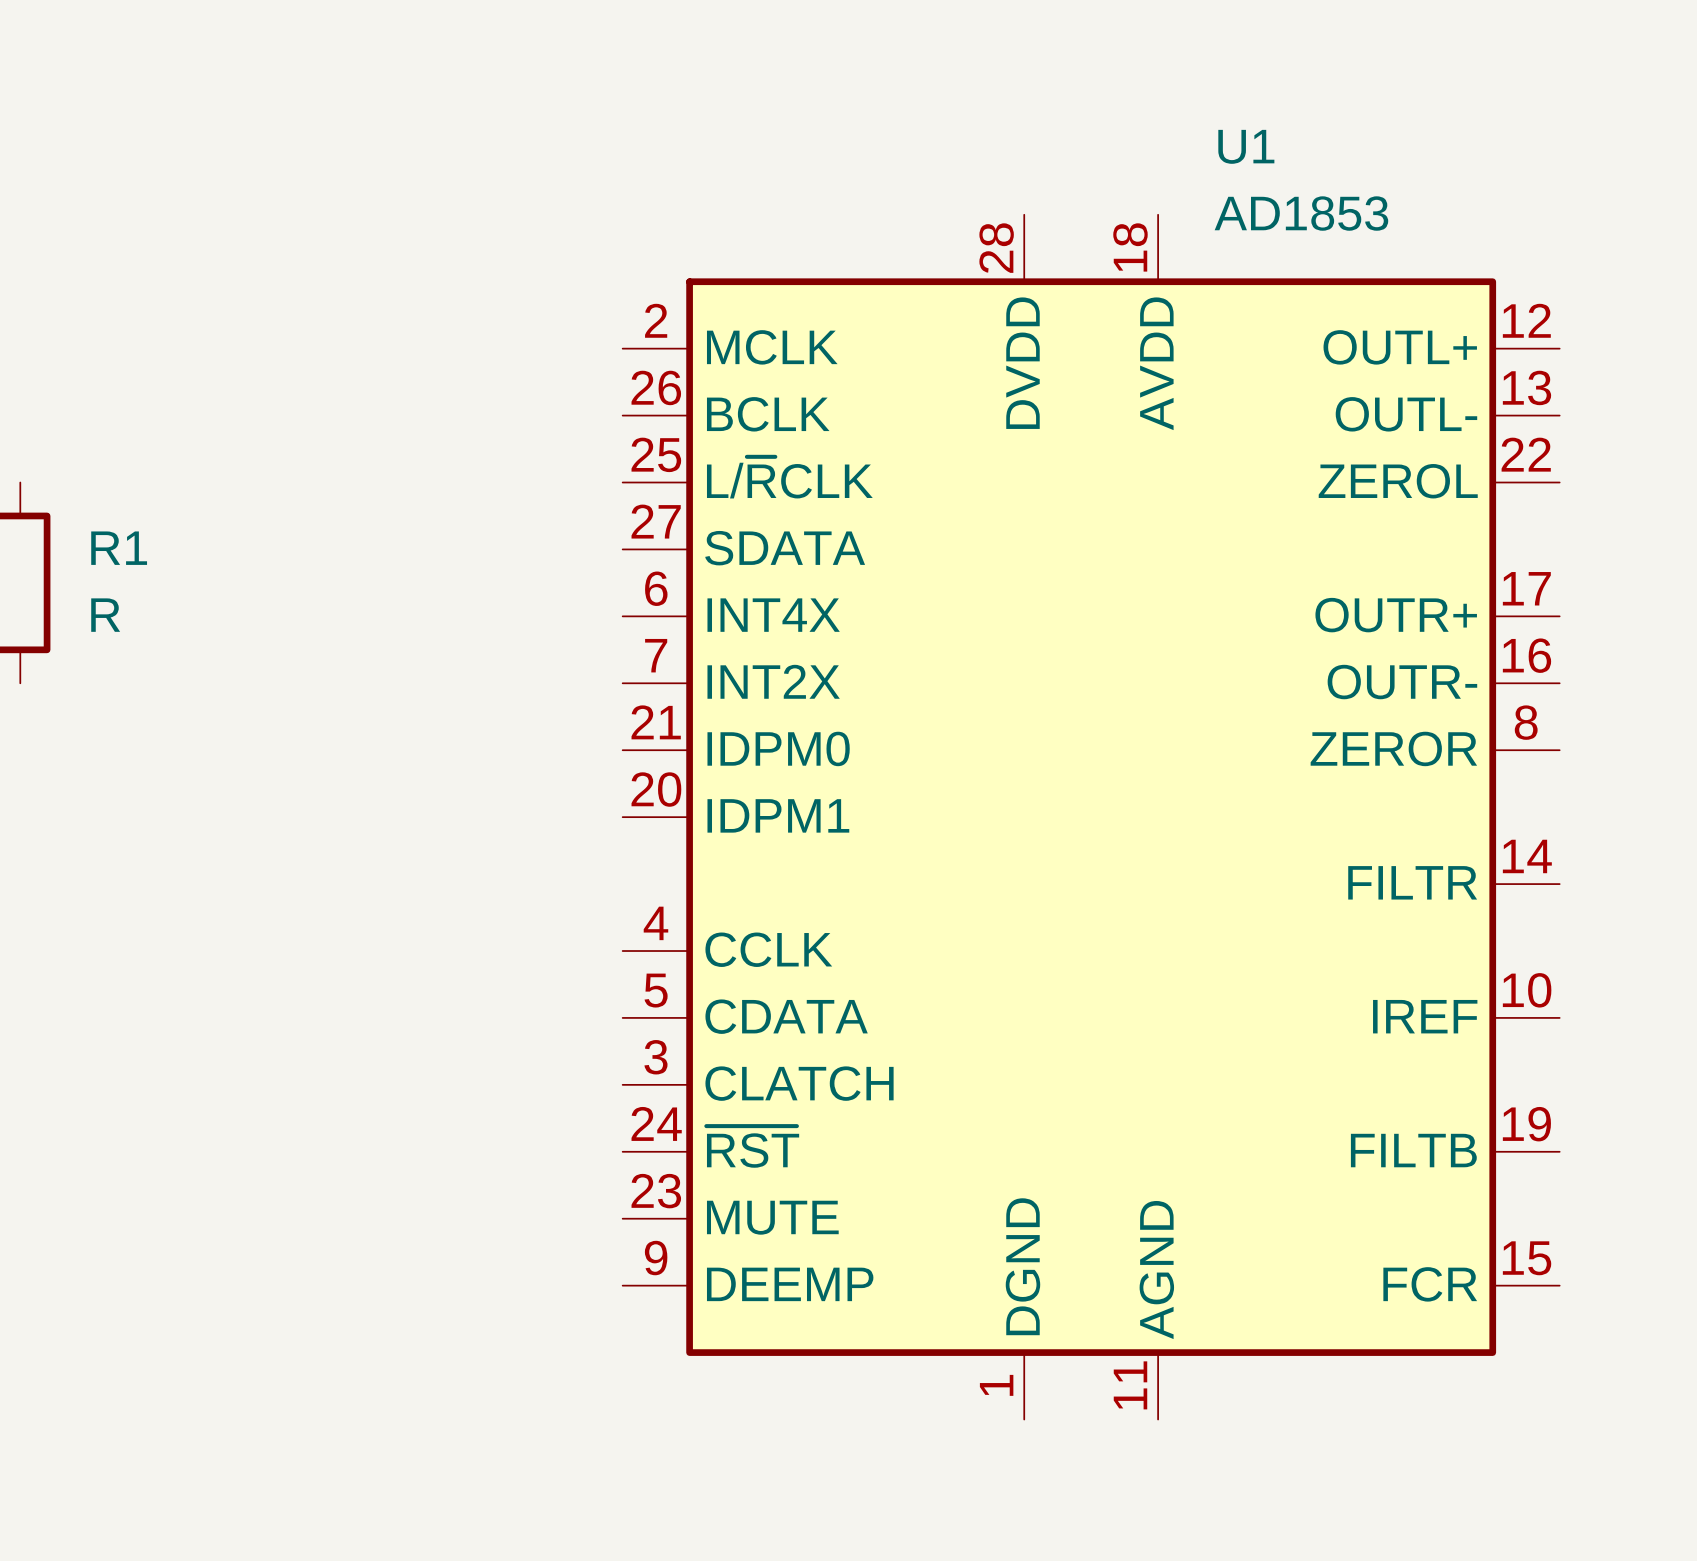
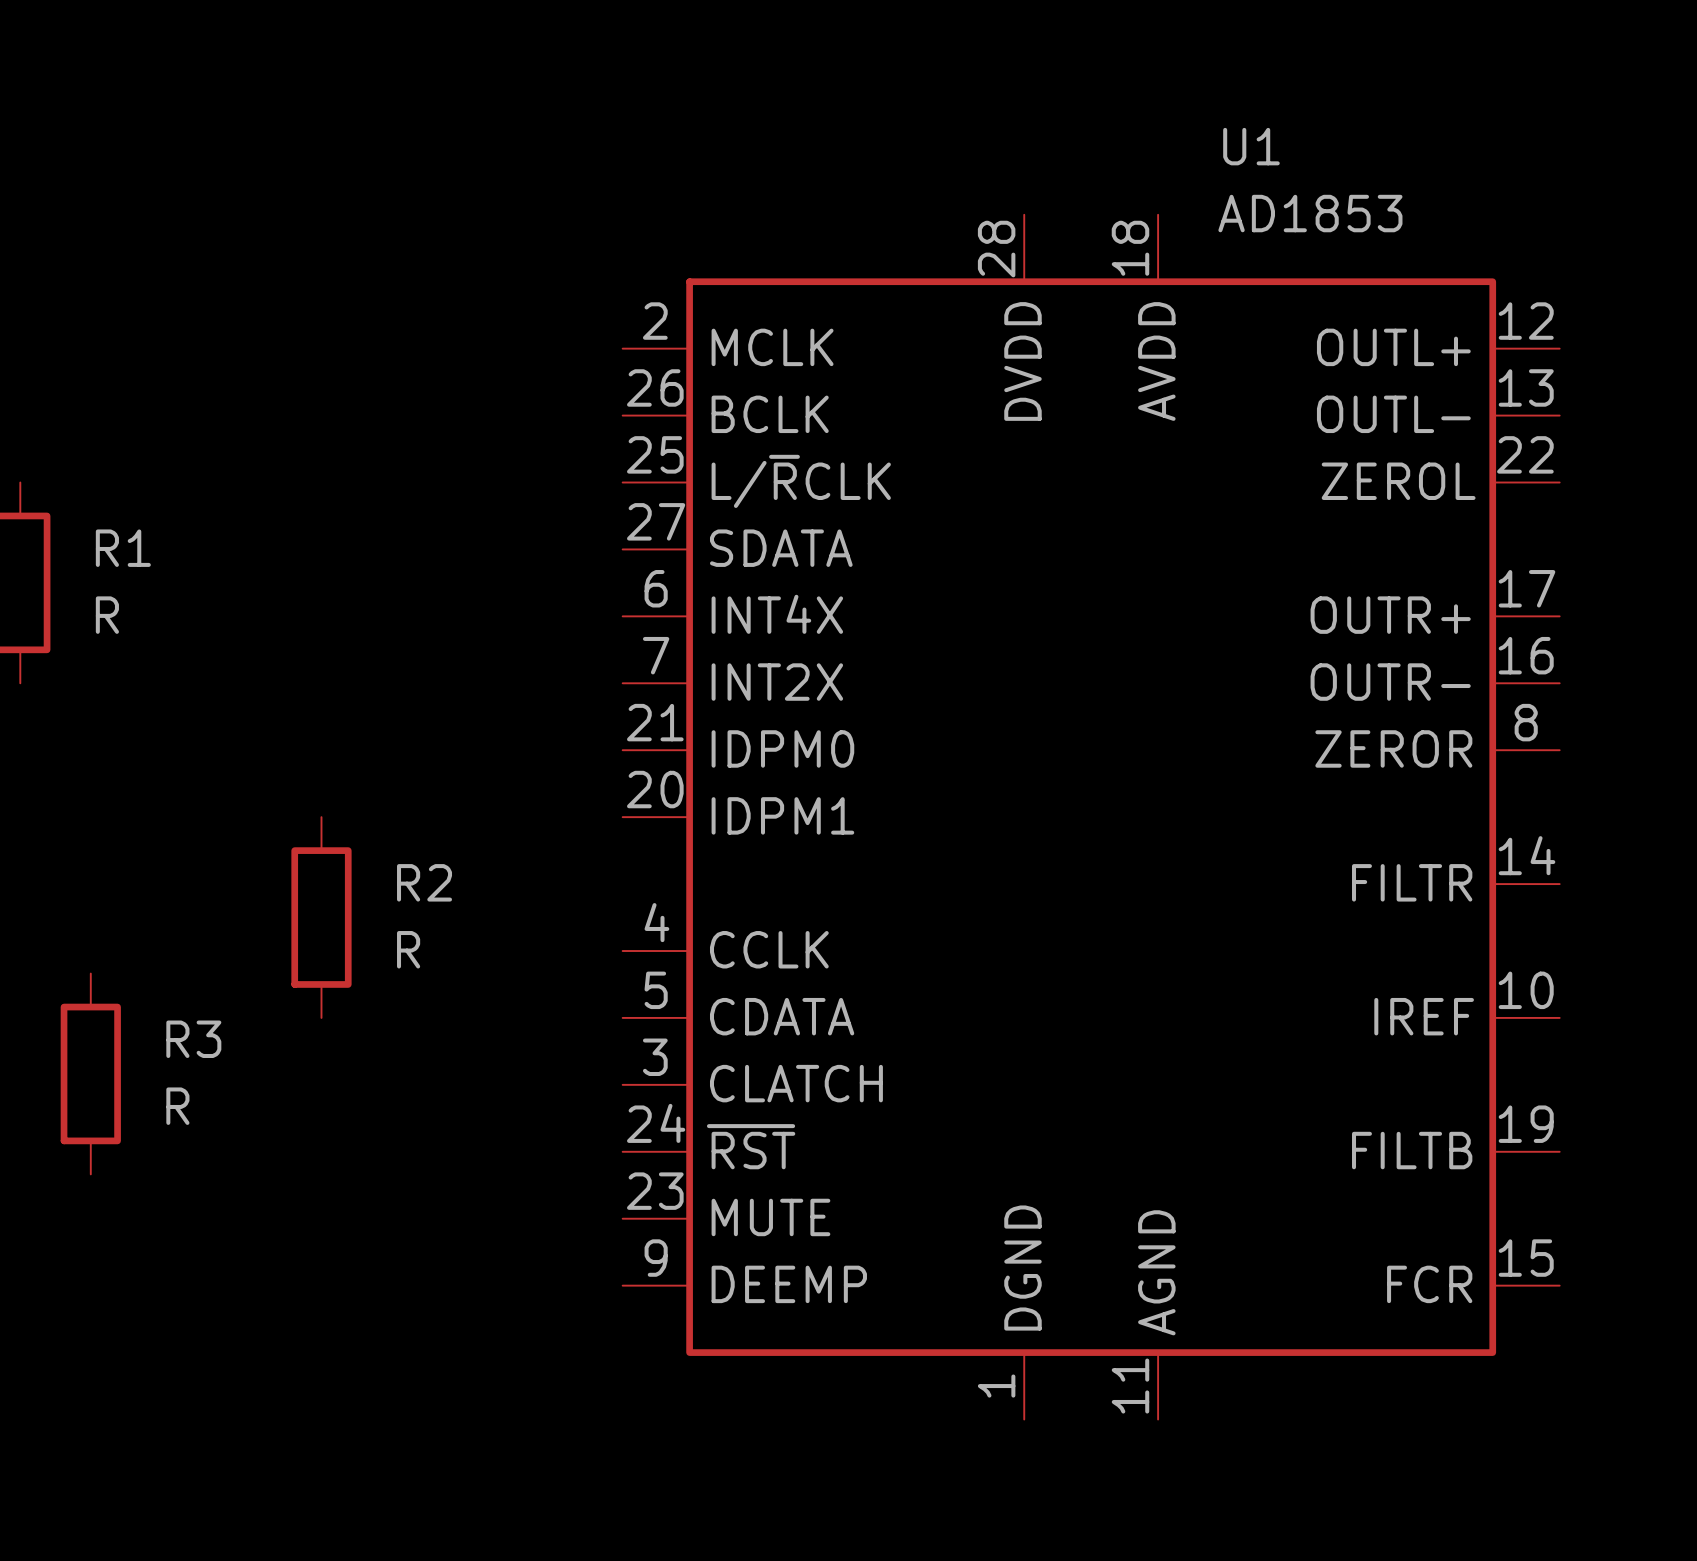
R2: none -> R (321, 917)
R3: none -> R (90, 1073)

